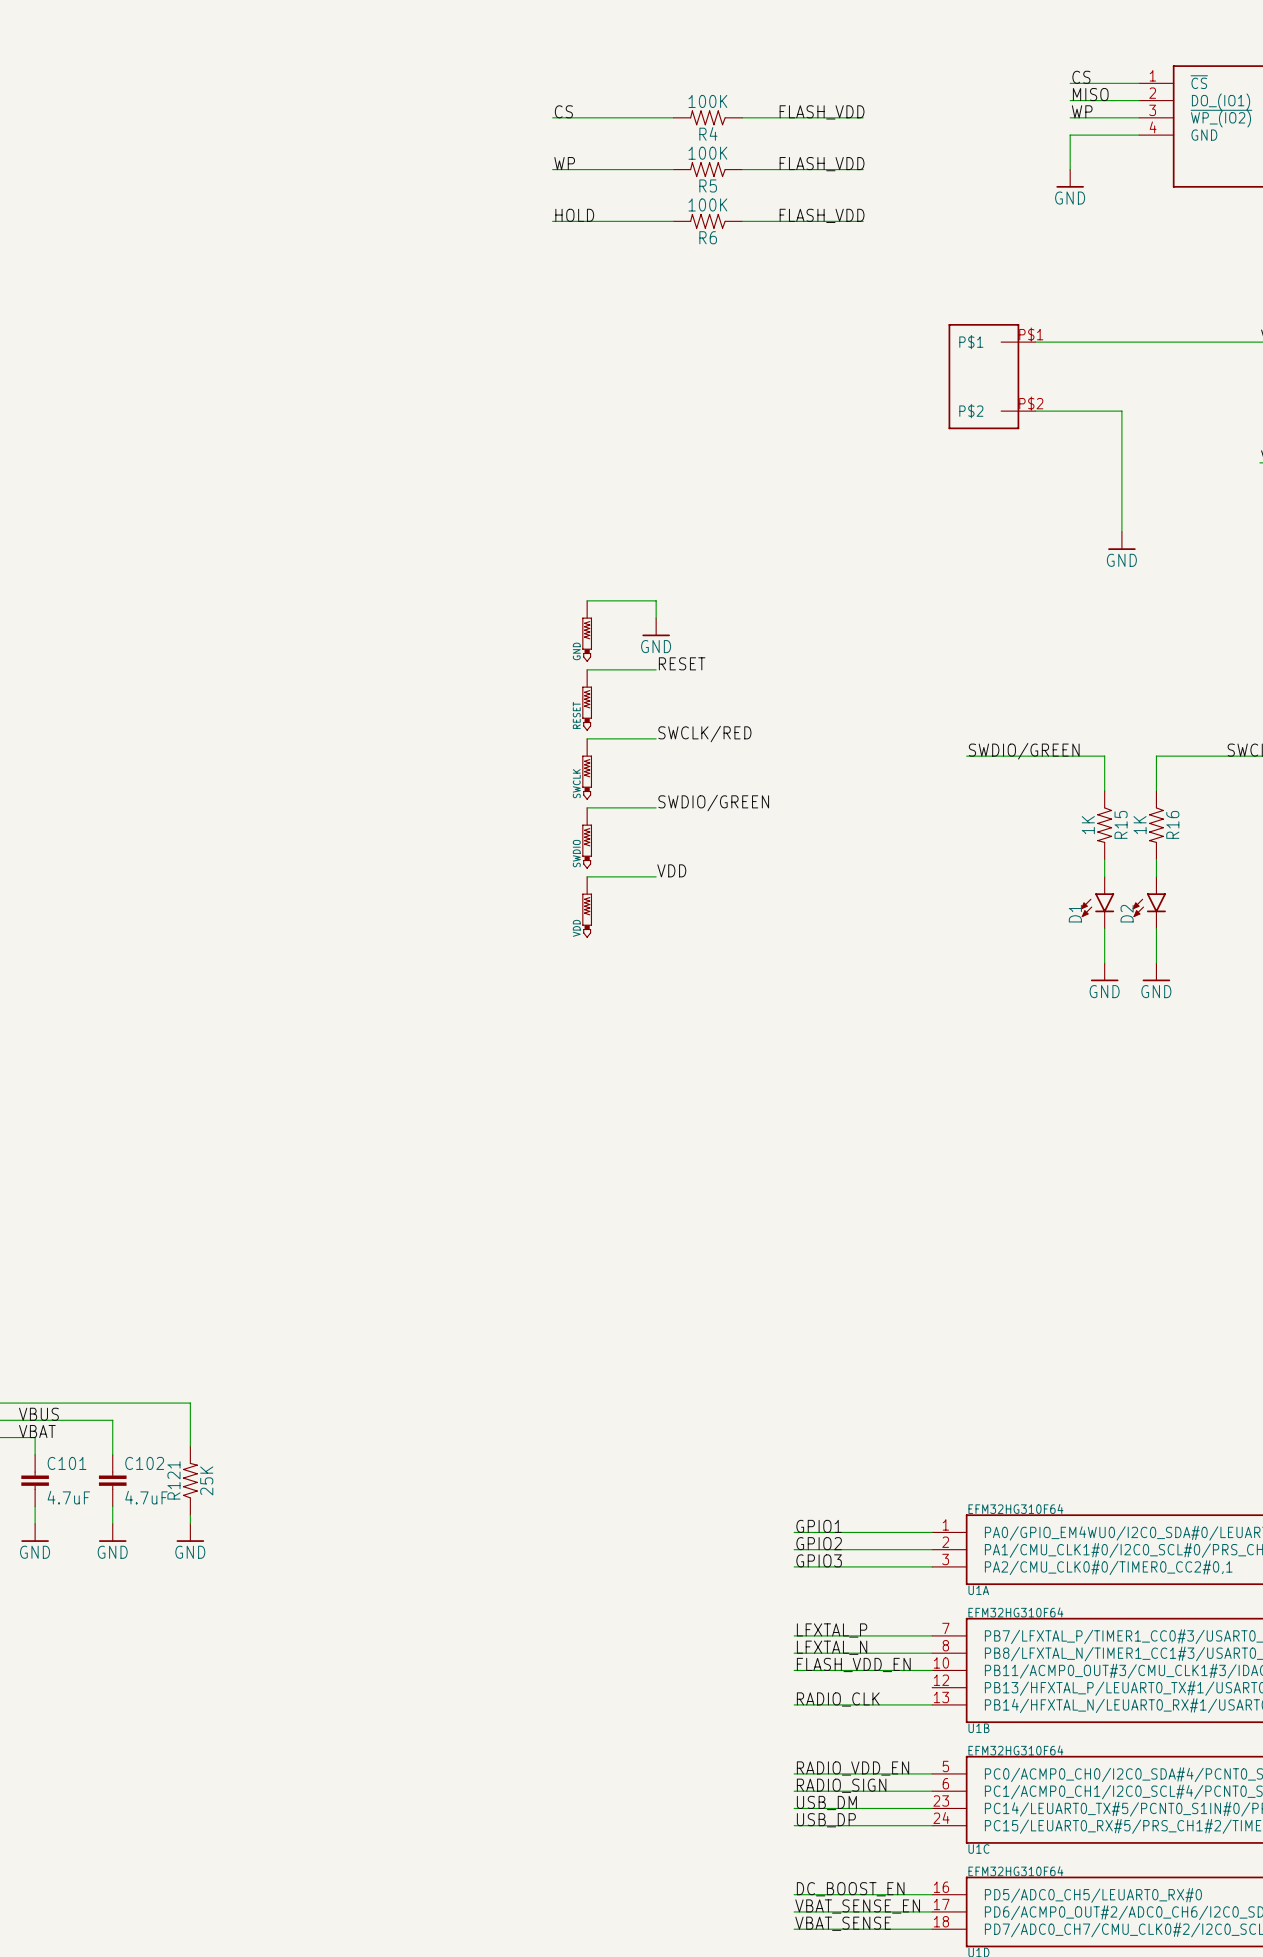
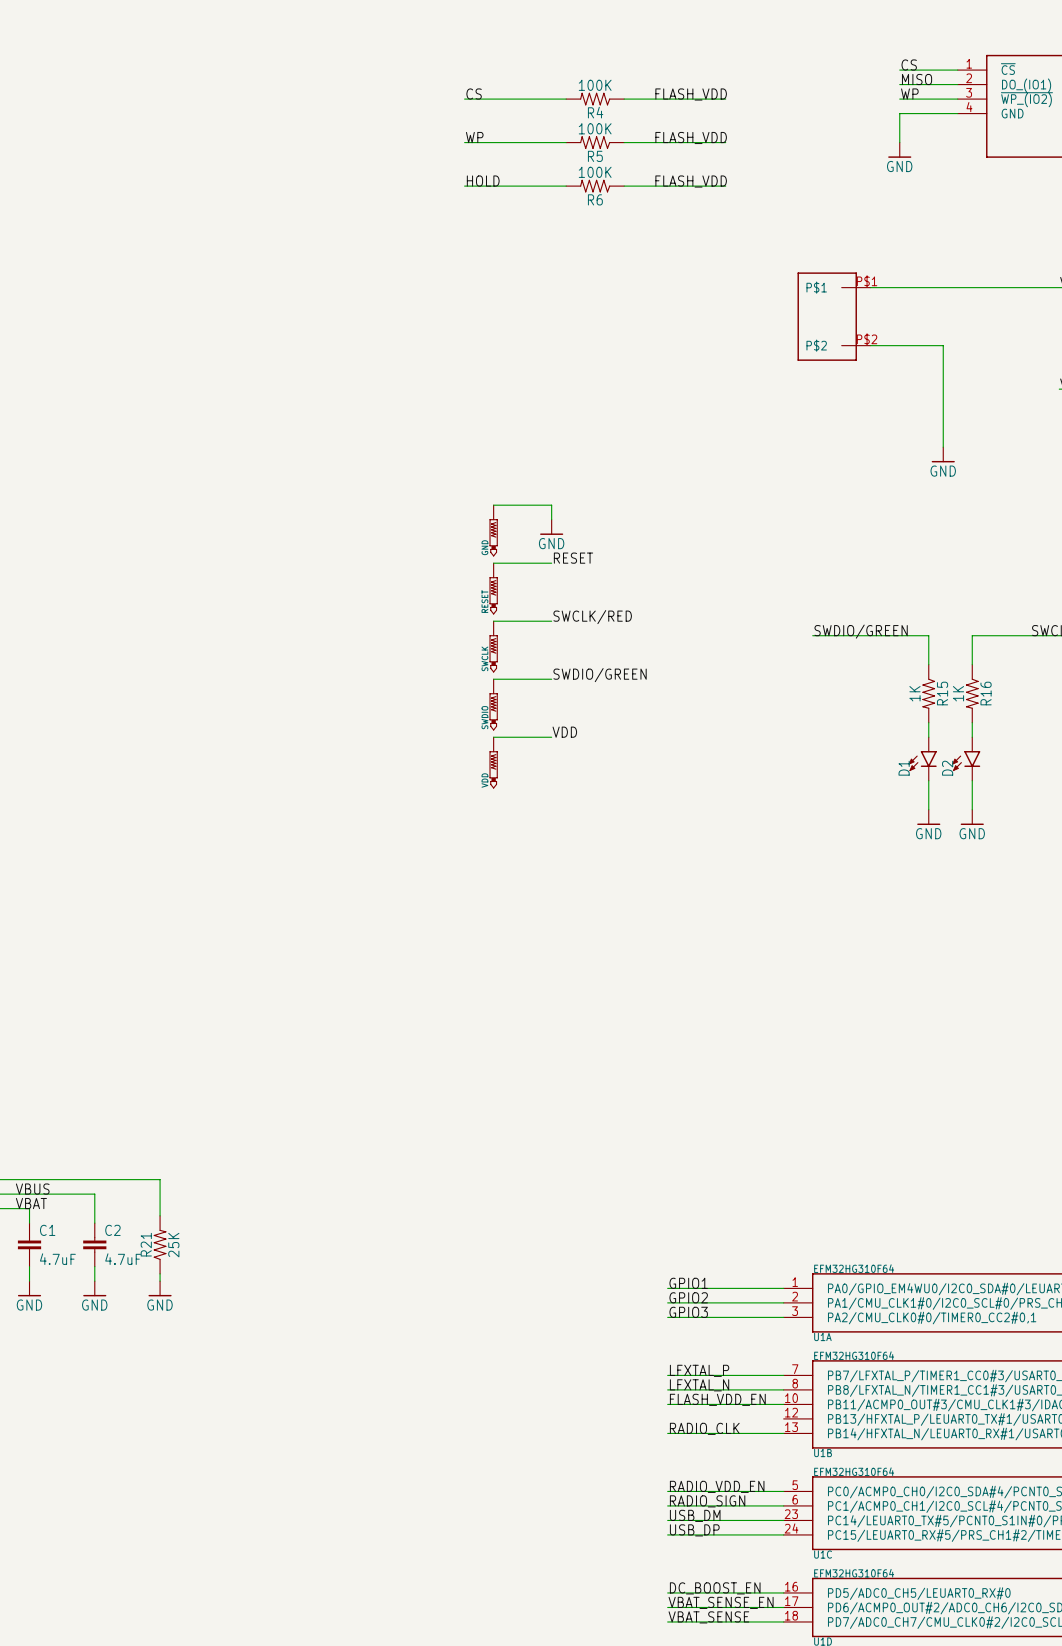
C101 name: C101 (67, 1463) -> C1 (47, 1230)
C102 name: C102 (144, 1463) -> C2 (112, 1230)
R121 name: R121 (173, 1480) -> R21 (146, 1244)

